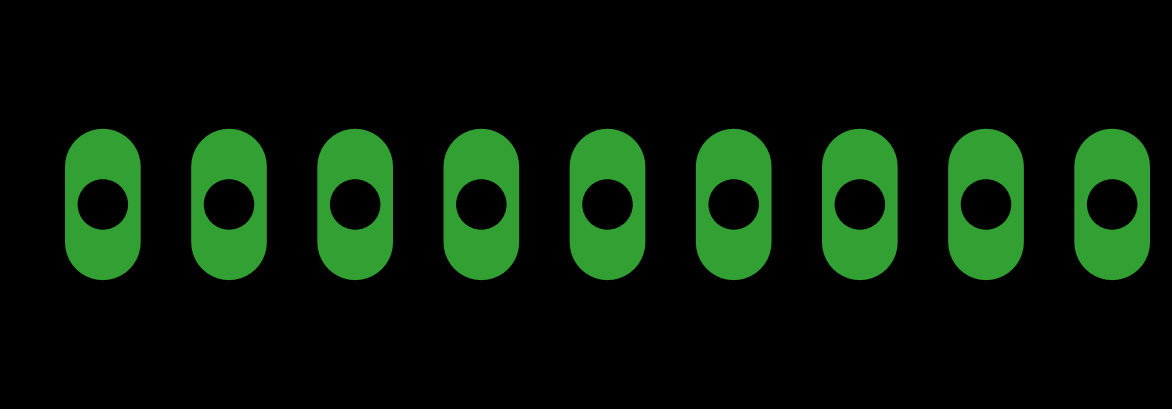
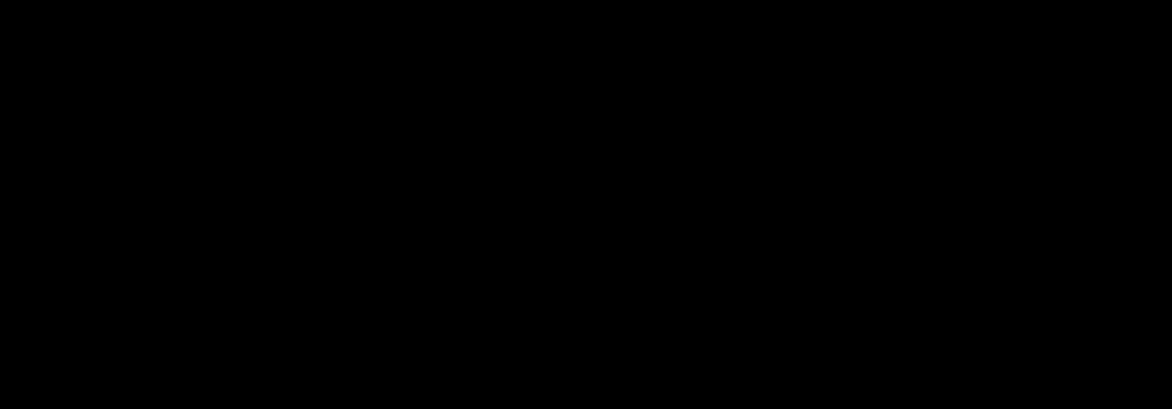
part: (607, 204) -> none

